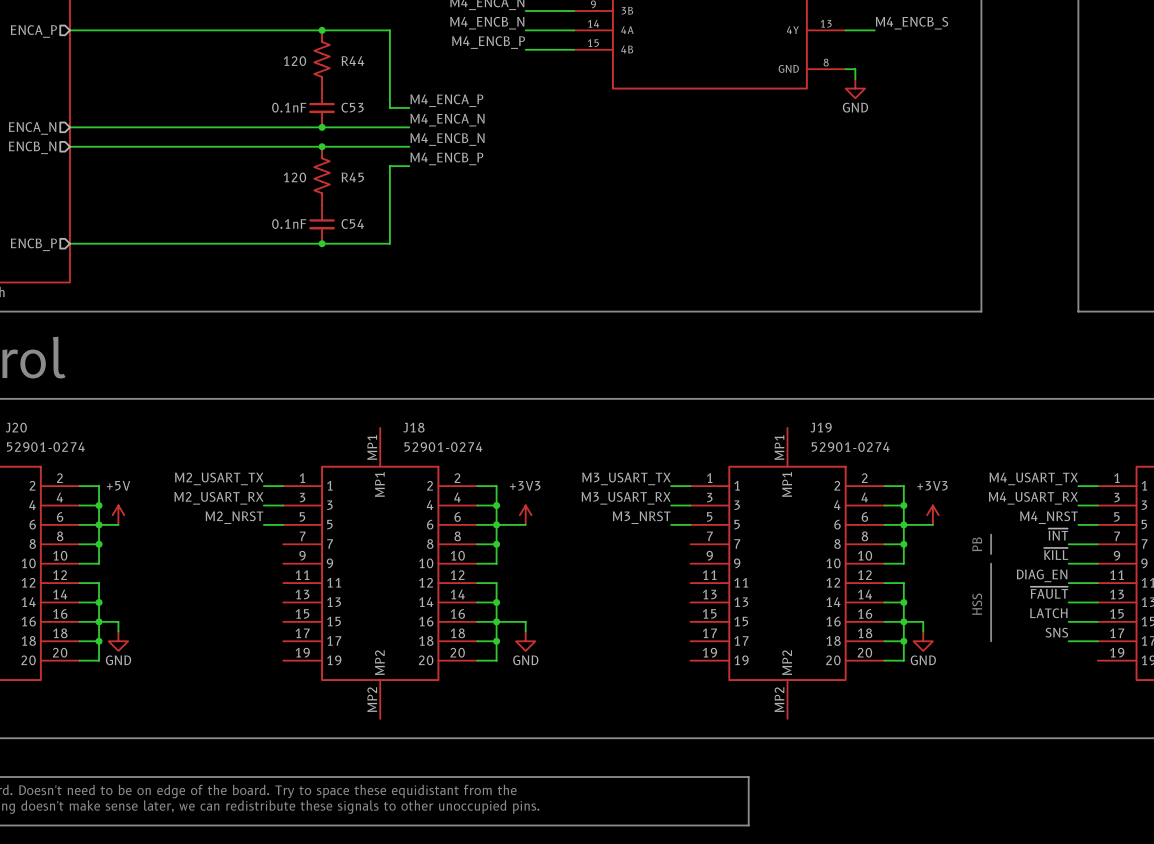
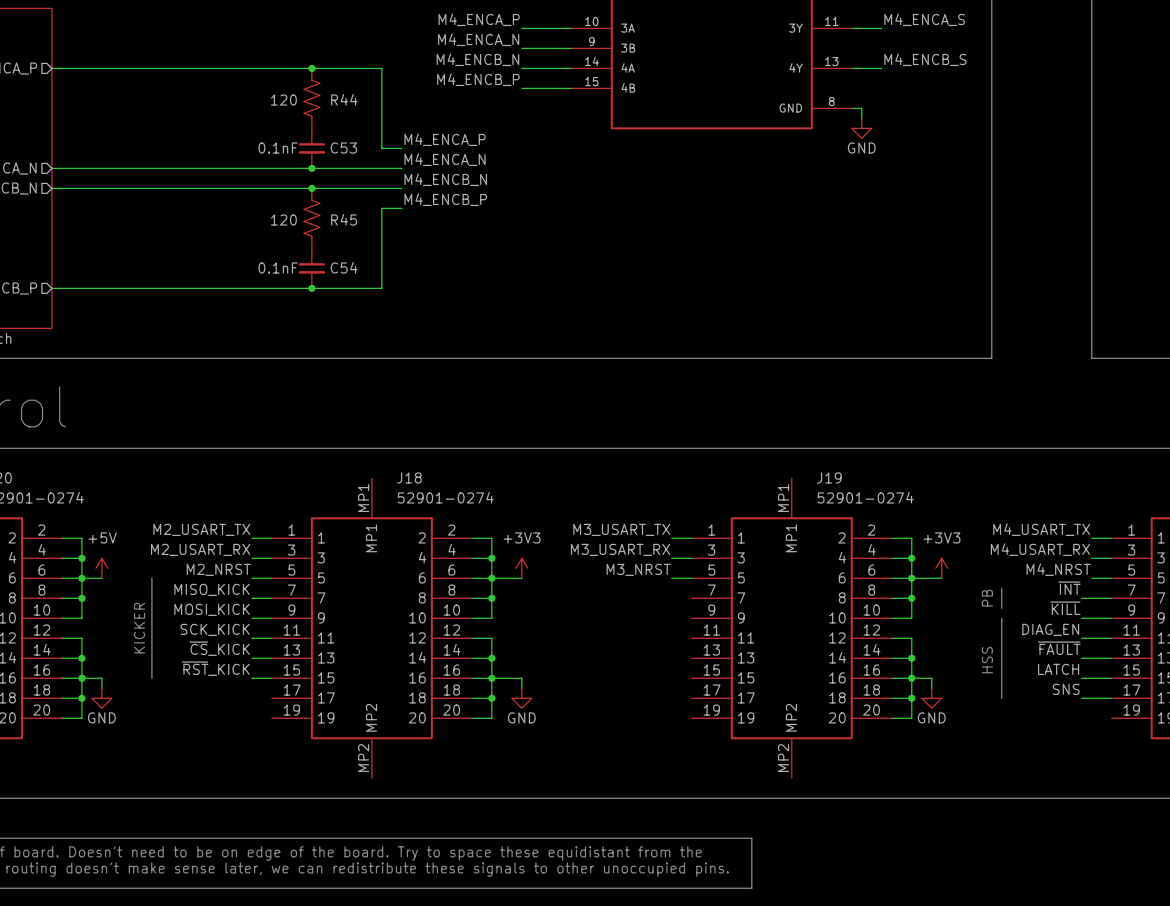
line: none -> (151, 578) (151, 678)
label: none -> MISO_KICK (212, 589)
wire: none -> (251, 598) (271, 598)
label: none -> MOSI_KICK (212, 609)
wire: none -> (251, 618) (271, 618)
text: none -> KICKER (139, 628)
label: none -> SCK_KICK (215, 629)
wire: none -> (251, 638) (271, 638)
label: none -> ~{CS}_KICK (219, 648)
wire: none -> (251, 658) (271, 658)
label: none -> ~{RST}_KICK (215, 668)
wire: none -> (251, 678) (271, 678)

